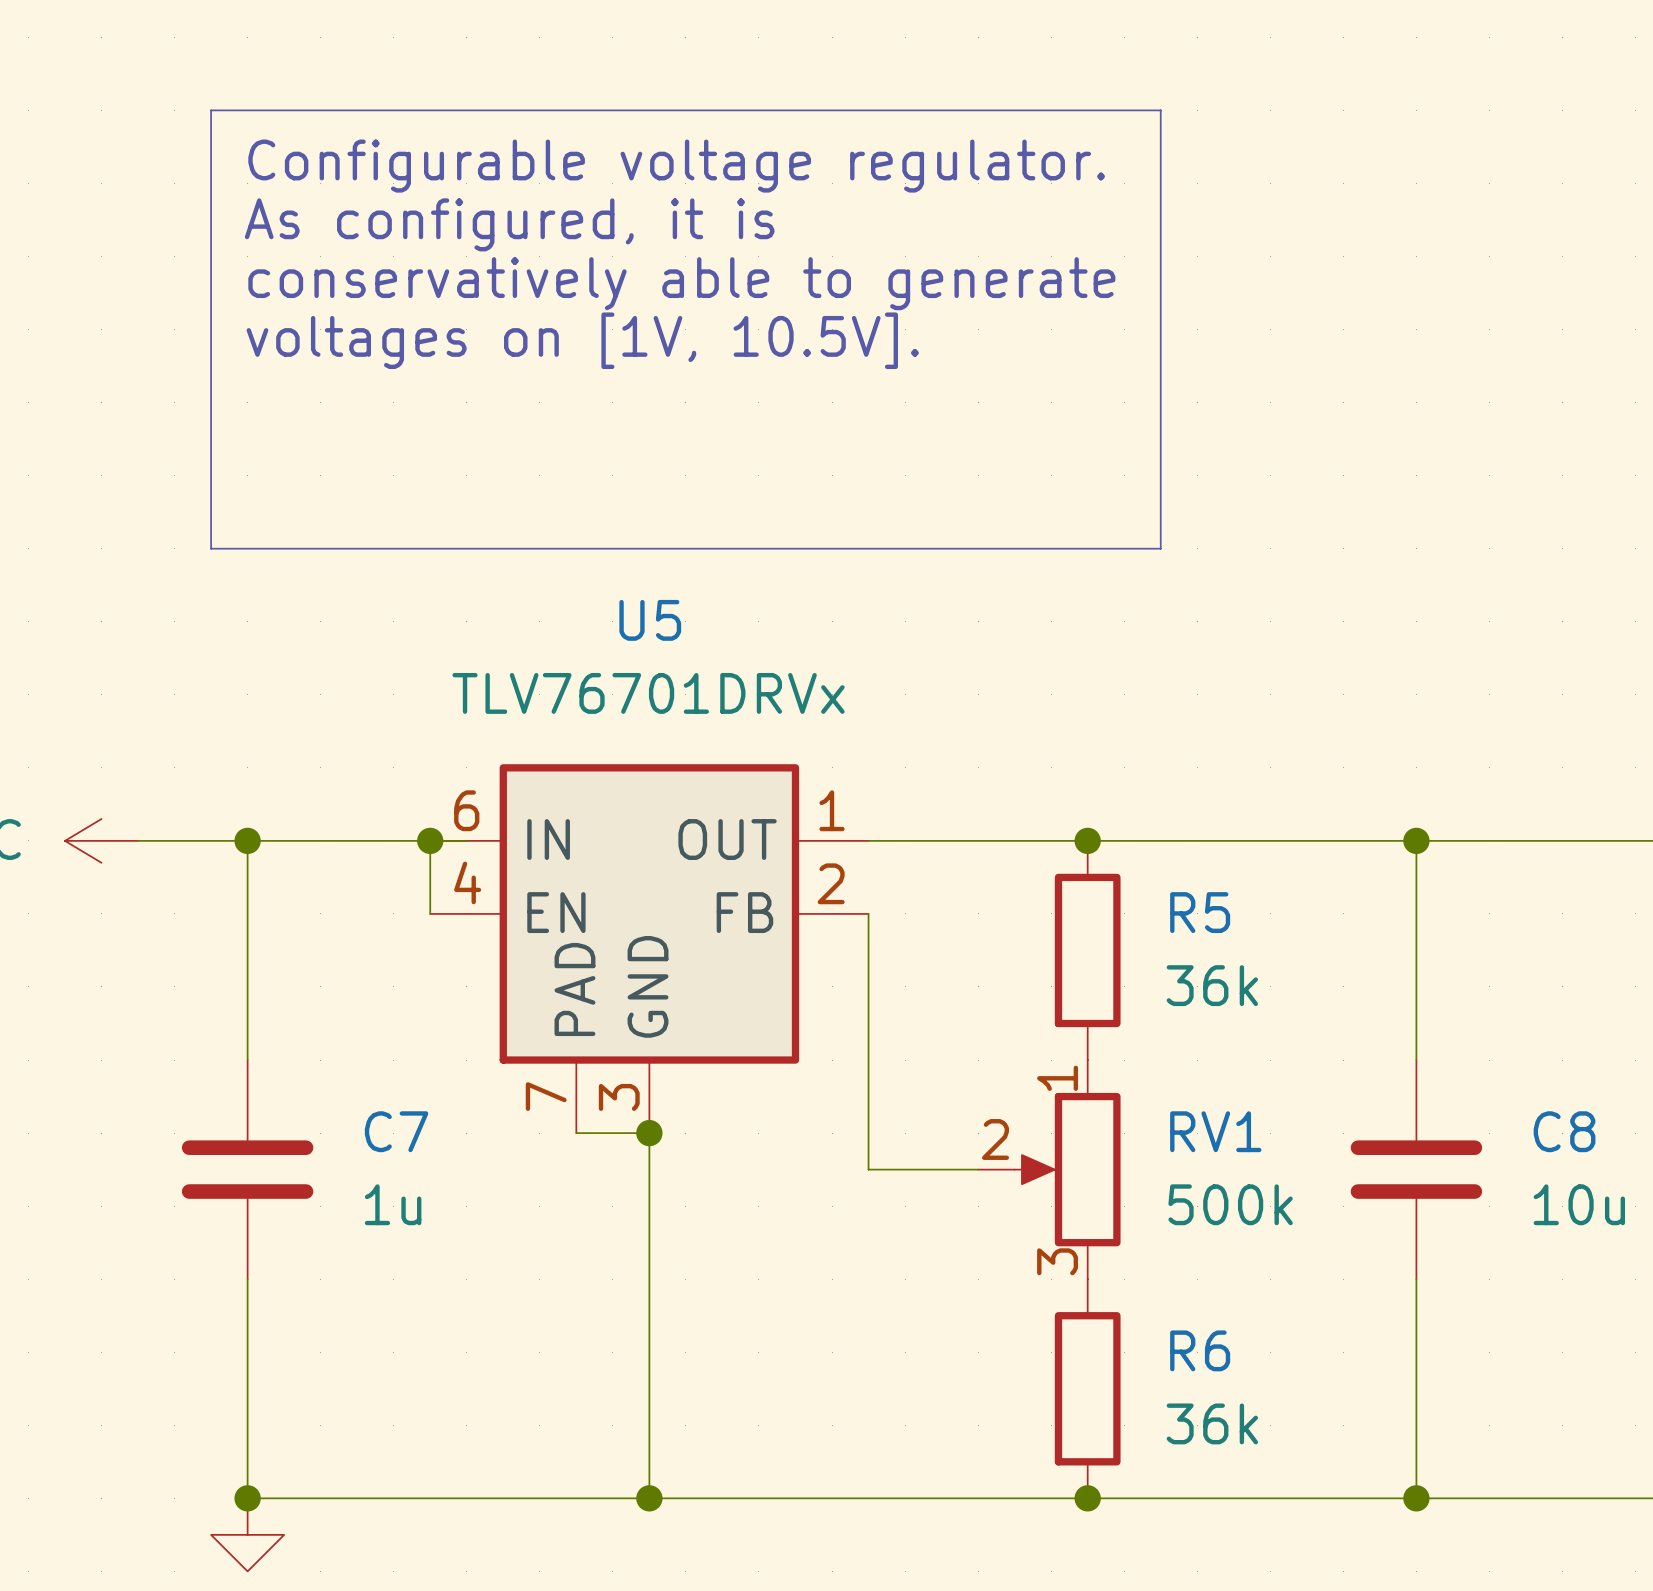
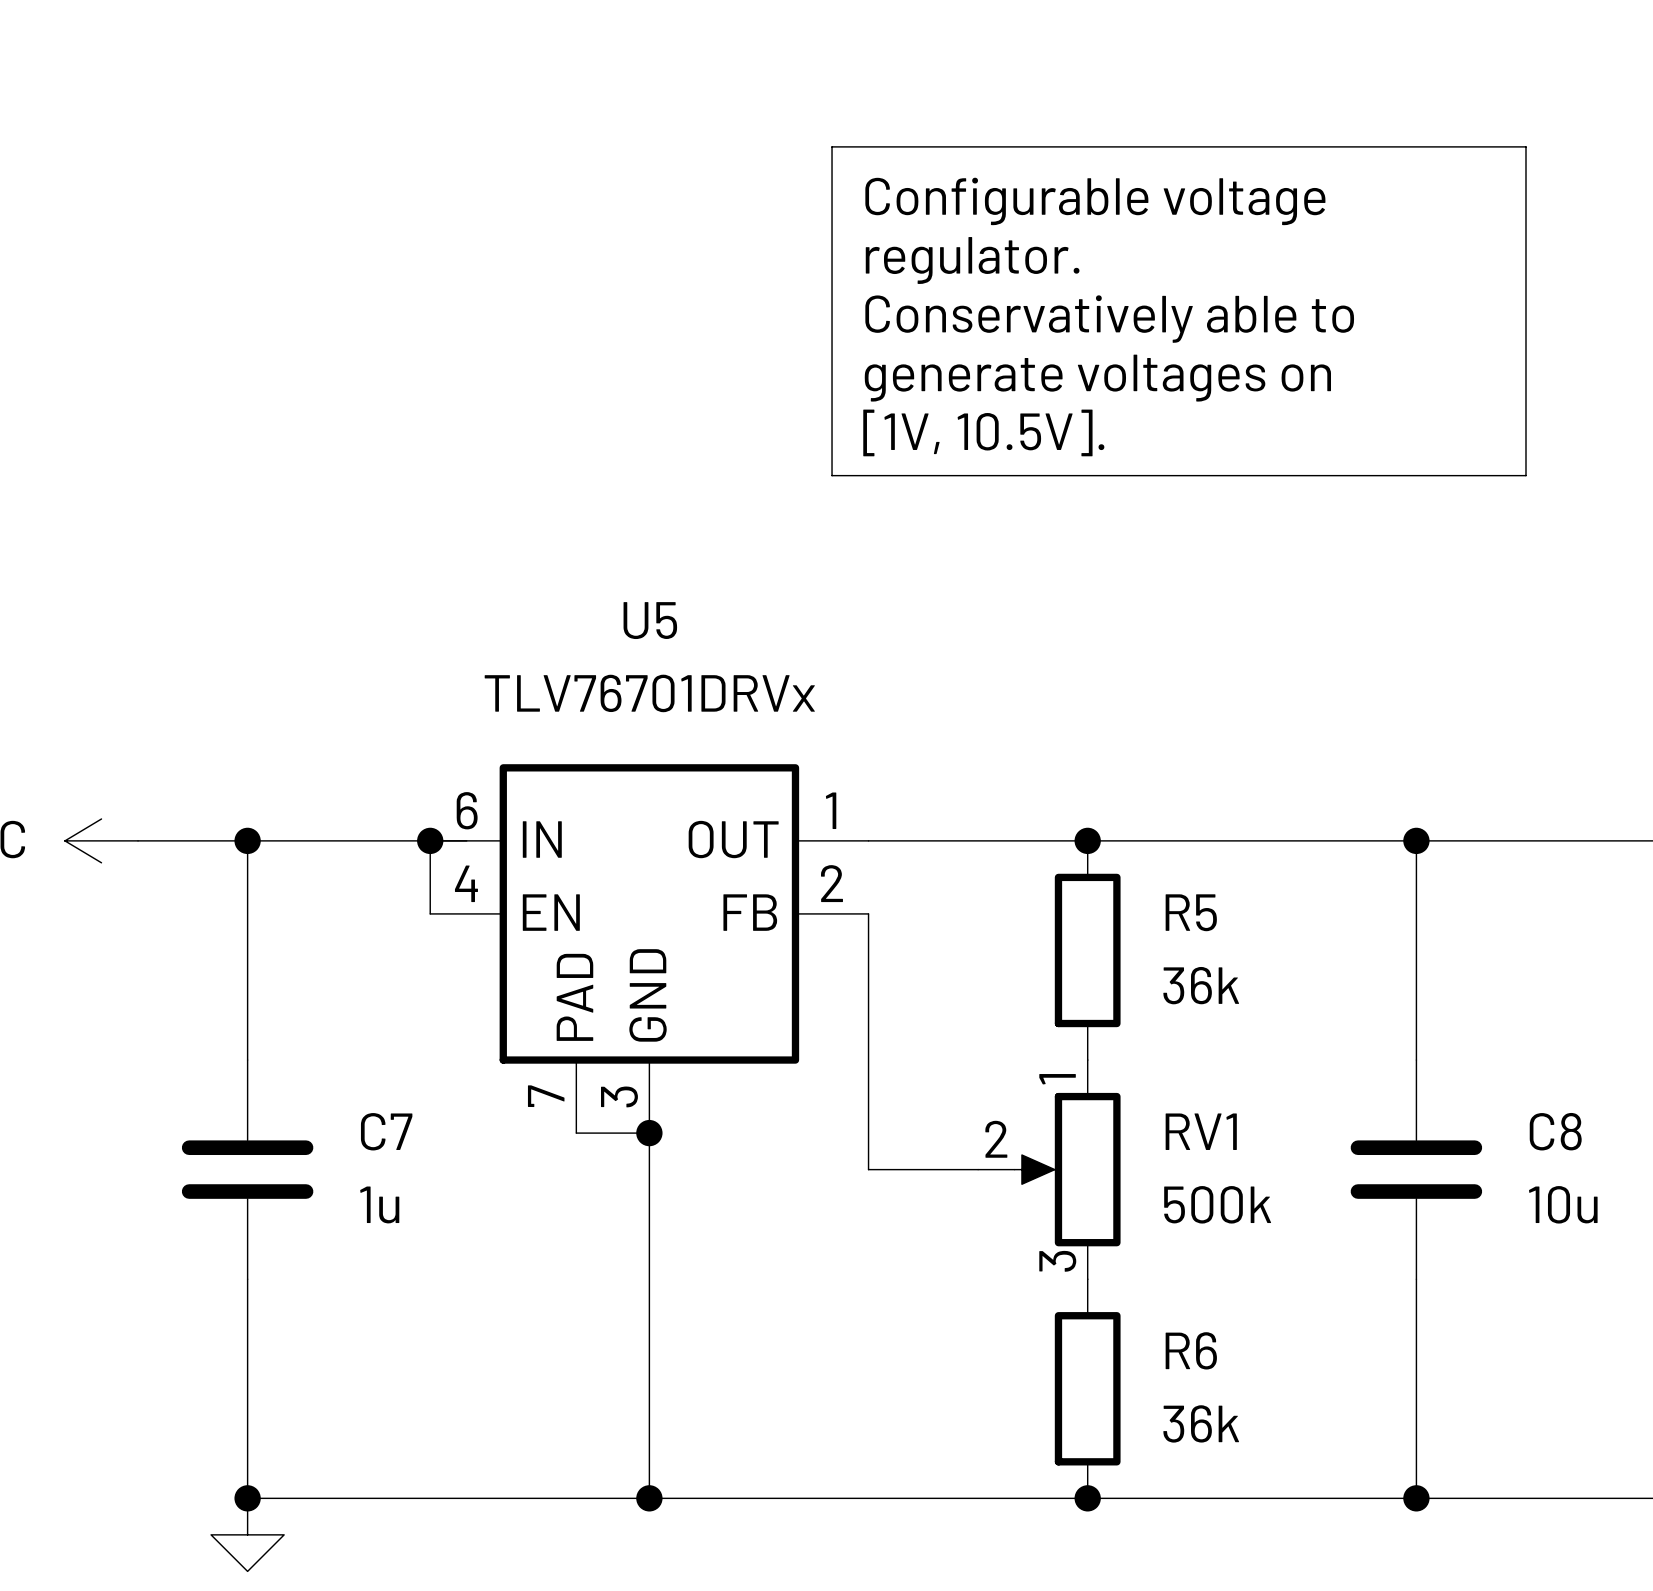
line: (211, 110) (1160, 110) (1160, 548) (211, 548) (211, 110) -> none
line: none -> (832, 146) (1525, 146) (1525, 475) (832, 475) (832, 146)
text: Configurable voltage regulator. (676, 166) -> Configurable voltage (1095, 201)
text: As configured, it is (509, 224) -> none
text: none -> regulator. (972, 260)
text: conservatively able to generate (681, 283) -> Conservatively able to (1109, 319)
text: voltages on [1V, 10.5V]. (582, 340) -> none
text: none -> generate voltages on (1097, 378)
text: none -> [1V, 10.5V]. (983, 432)

